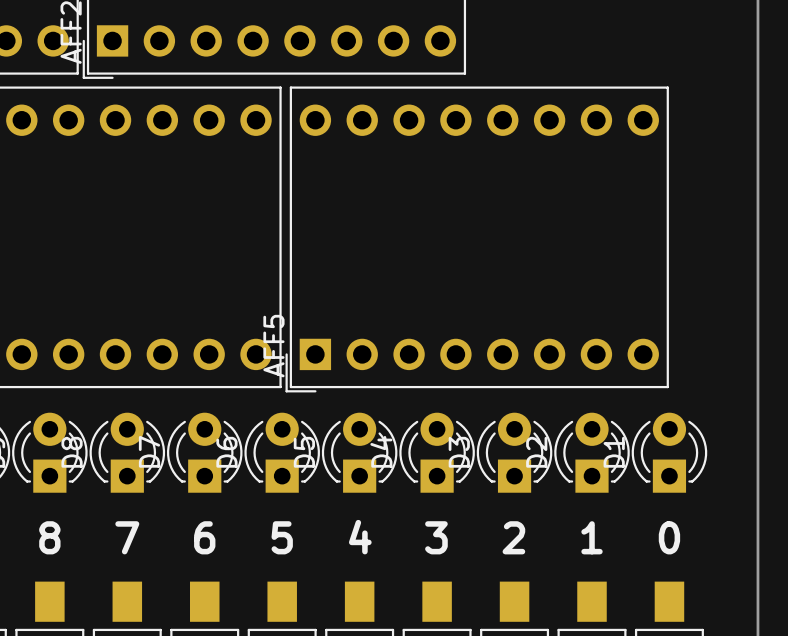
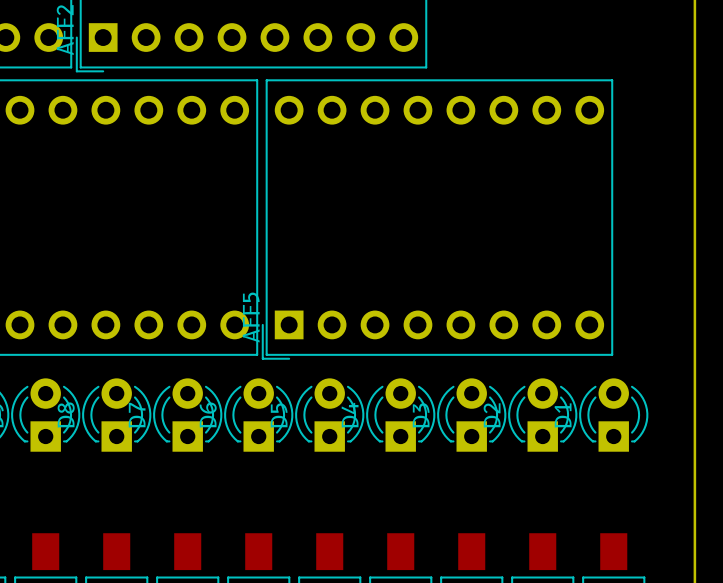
text: 8 (49, 537) -> none
text: 7 (127, 537) -> none
text: 6 (204, 537) -> none
text: 5 (282, 537) -> none
text: 4 (360, 537) -> none
text: 3 (436, 537) -> none
text: 2 (513, 537) -> none
text: 1 (592, 537) -> none
text: 0 (669, 537) -> none

